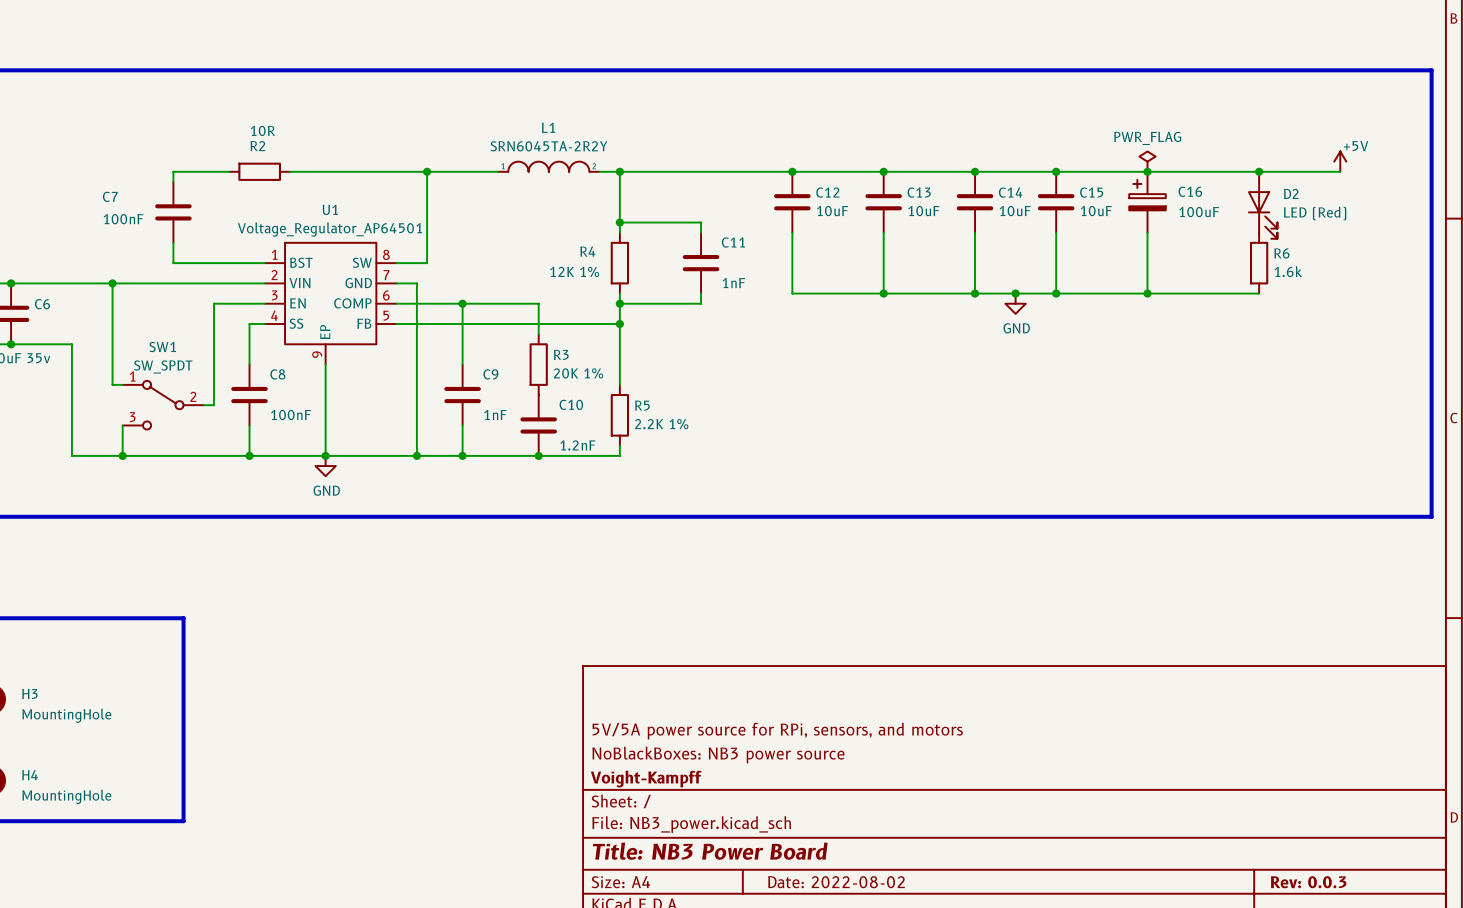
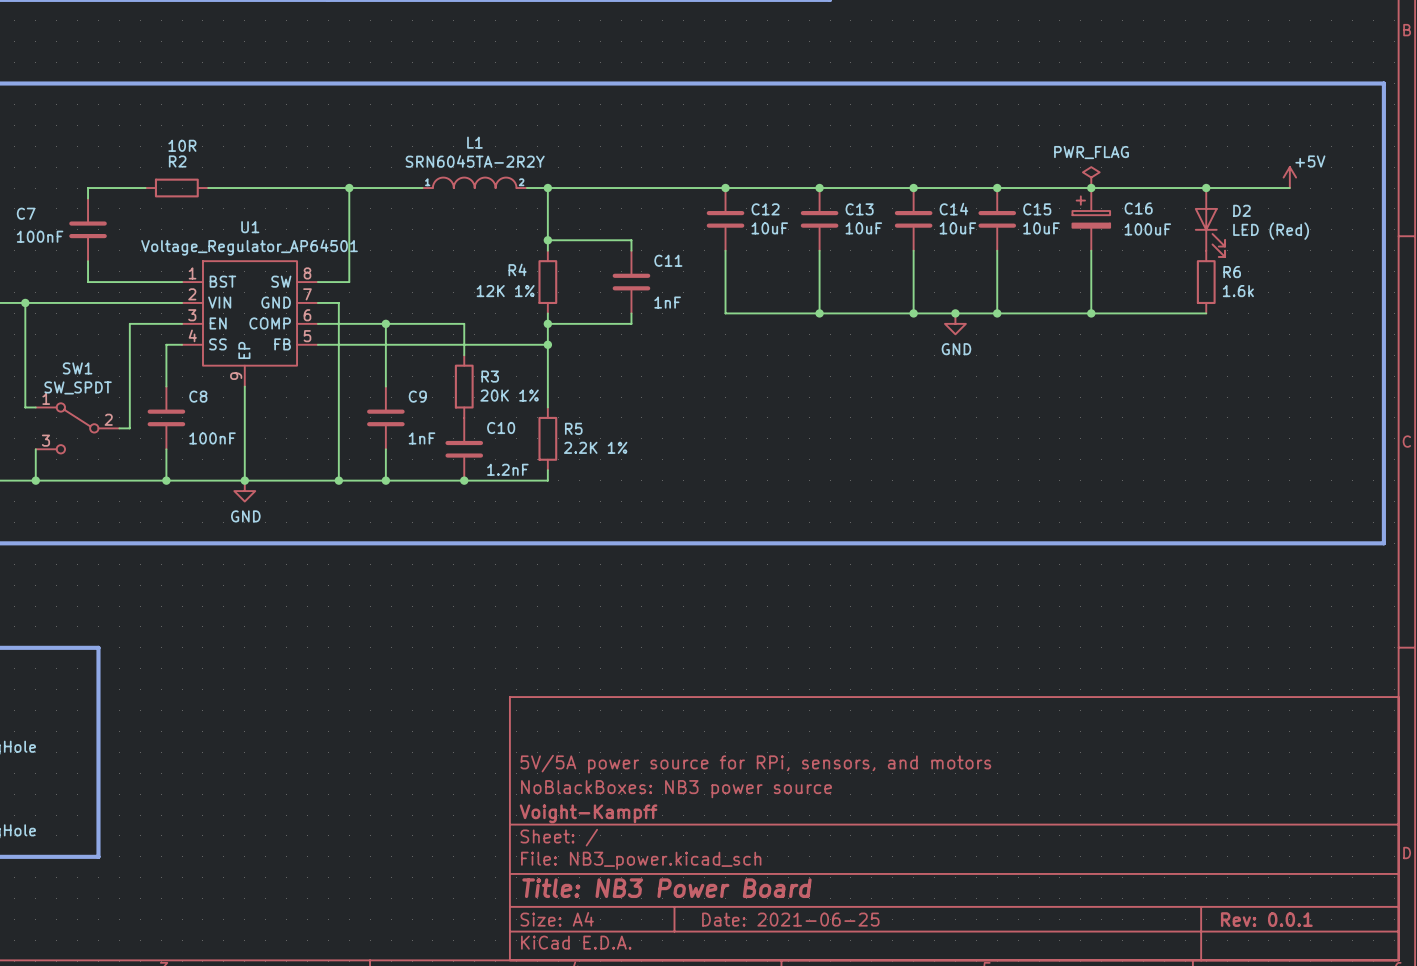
title block: Date: 2022-08-02 (836, 882) -> Date: 2021-06-25 (790, 919)
title block: Rev: 0.0.3 (1308, 882) -> Rev: 0.0.1 (1266, 919)

